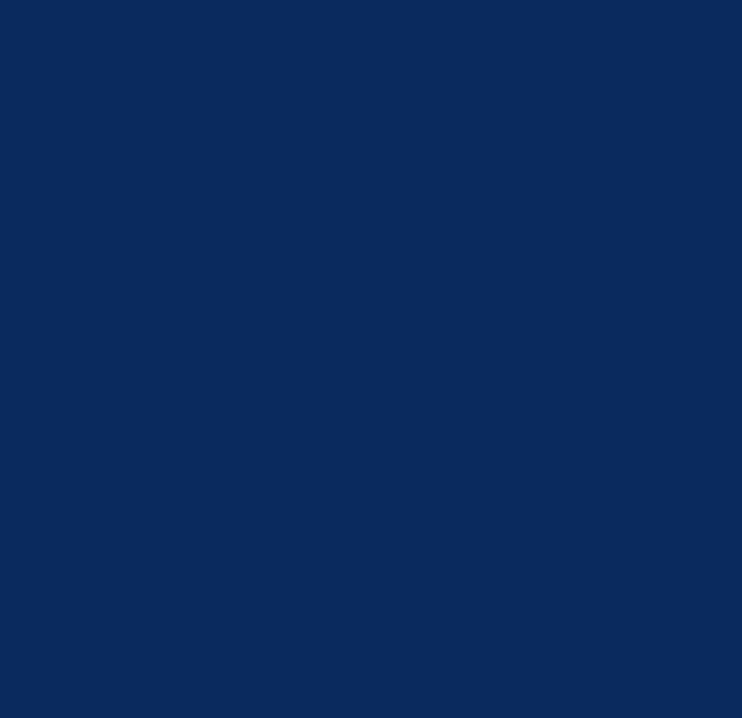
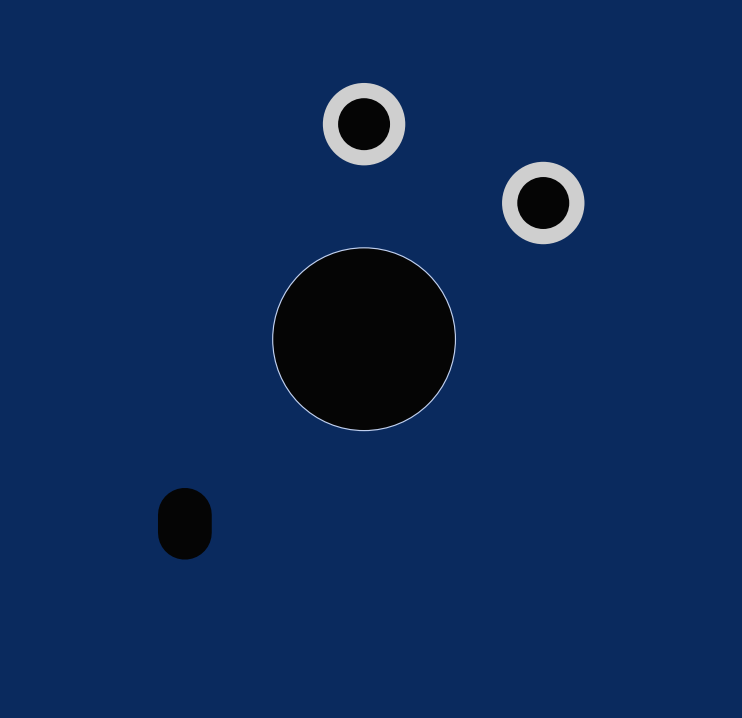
part: none -> (371, 321)

